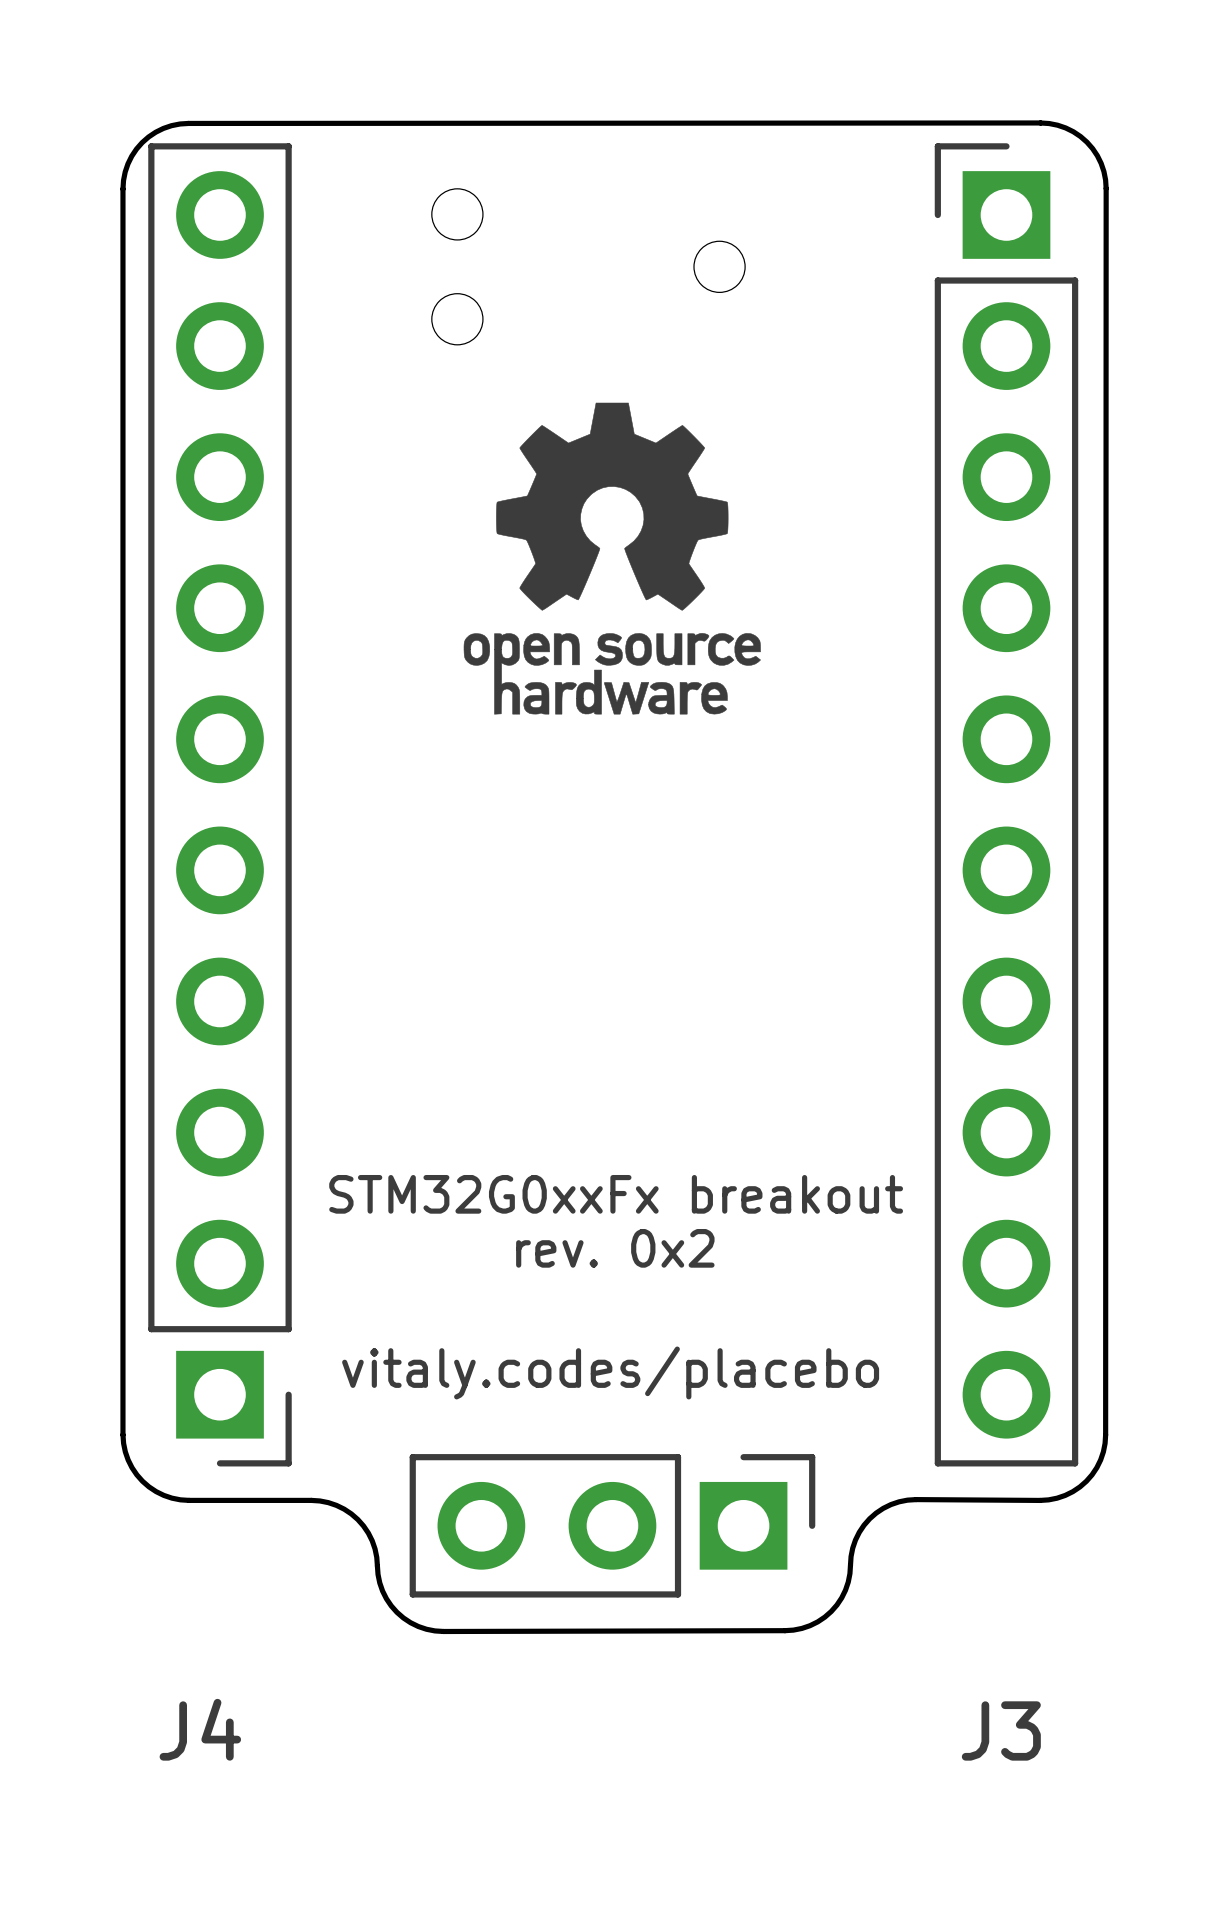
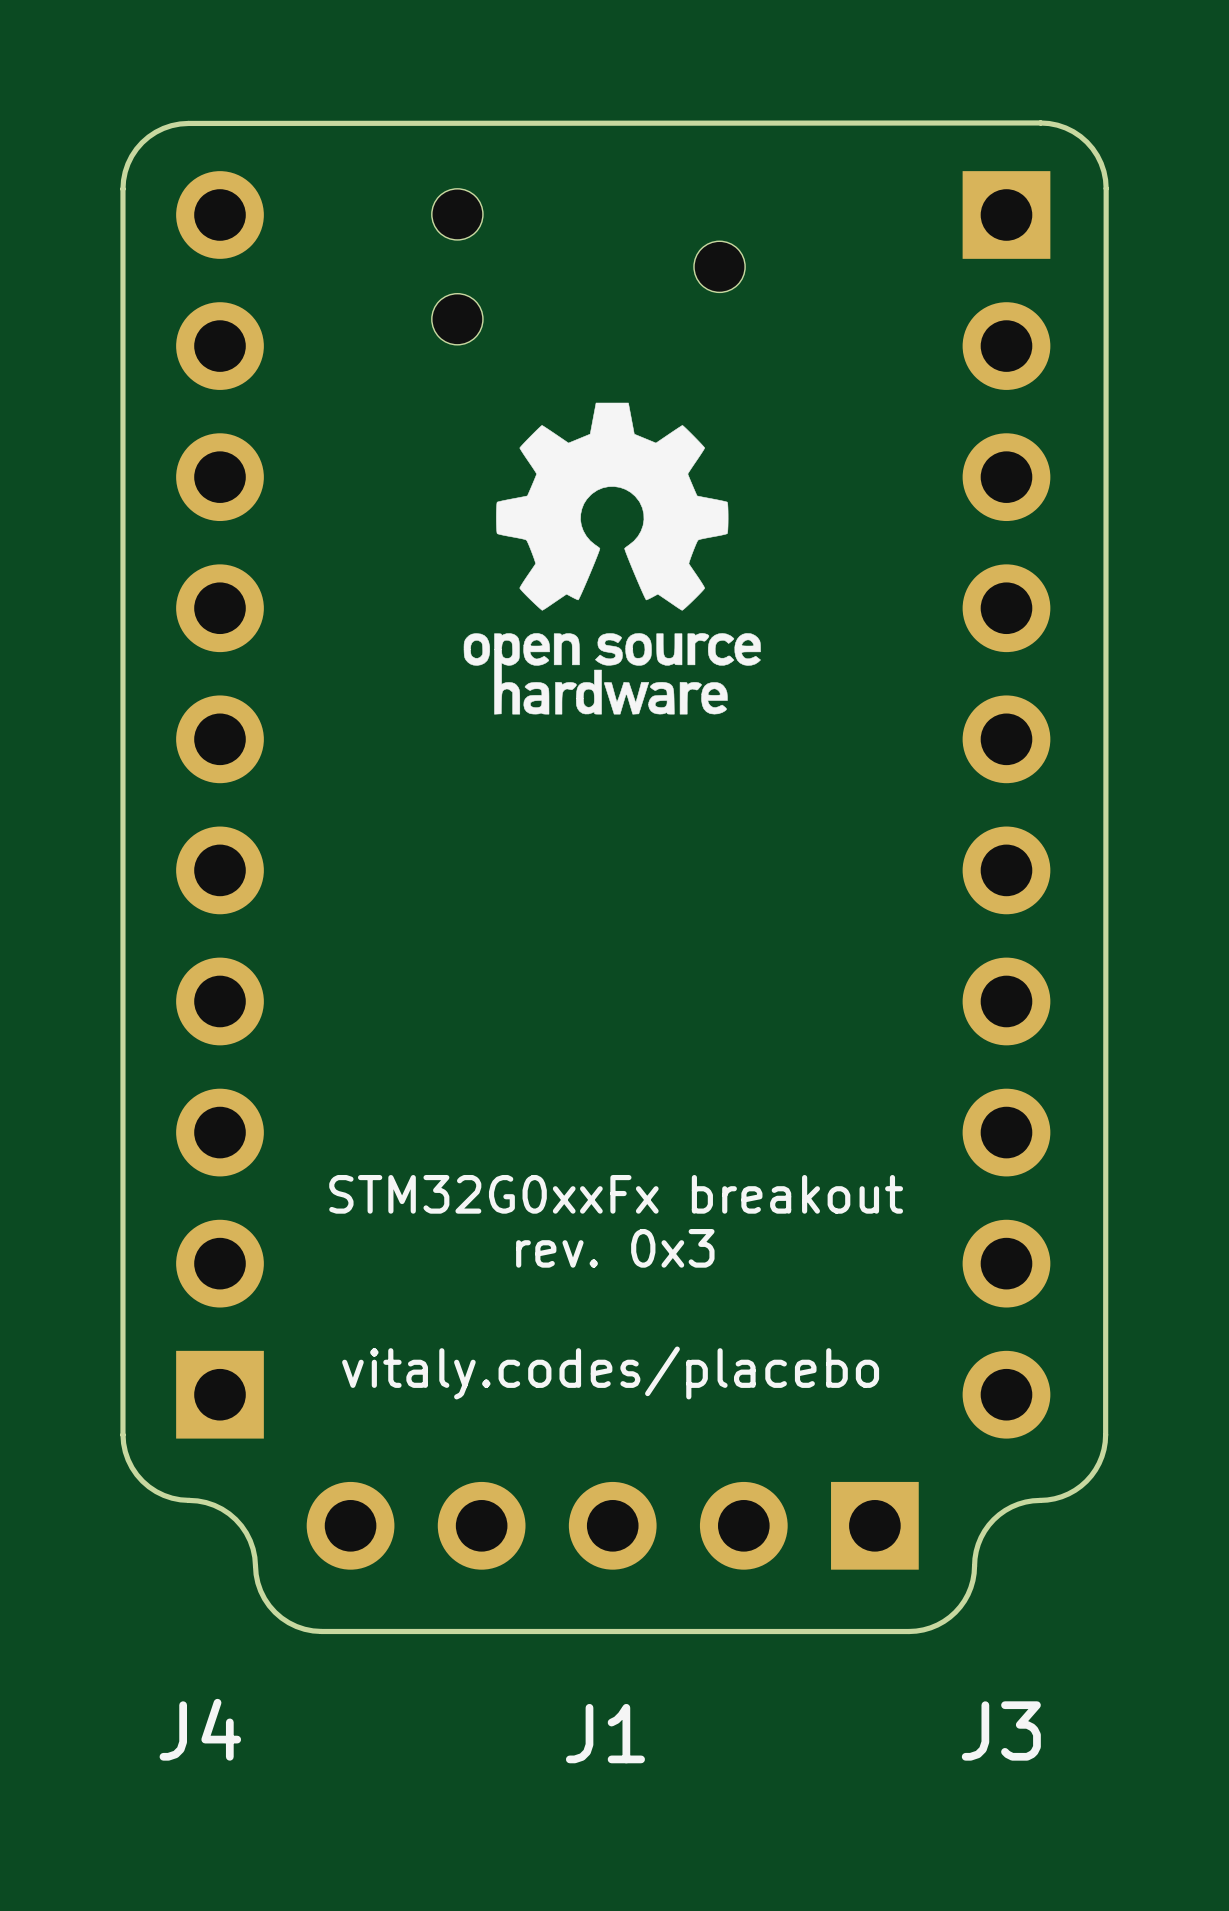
J4 footprint: [148, 143, 292, 1467] -> [176, 171, 264, 1439]
J3 footprint: [934, 143, 1079, 1467] -> [962, 171, 1051, 1439]
text: rev. 0x2 (615, 1248) -> rev. 0x3 (615, 1248)
board edge: (1105, 1434) (1103, 1451) (1092, 1474) (1072, 1491) (1057, 1498) (1040, 1500) (916, 1499) (899, 1501) (883, 1508) (864, 1525) (855, 1540) (851, 1556) (848, 1582) (836, 1605) (817, 1621) (793, 1630) (443, 1631) (426, 1629) (403, 1617) (391, 1605) (379, 1582) (376, 1557) (372, 1540) (363, 1526) (344, 1509) (328, 1502) (311, 1500) (189, 1500) -> (1105, 1434) (1104, 1449) (1099, 1463) (1091, 1475) (1080, 1486) (1068, 1493) (1054, 1498) (1018, 1504) (1005, 1510) (993, 1519) (984, 1531) (978, 1544) (972, 1580) (964, 1600) (955, 1612) (943, 1621) (930, 1627) (916, 1631) (313, 1630) (288, 1622) (269, 1605) (257, 1582) (254, 1557) (250, 1540) (235, 1519) (214, 1505) (189, 1500)
part: (612, 1525) -> none
J1: none -> (612, 1525)

